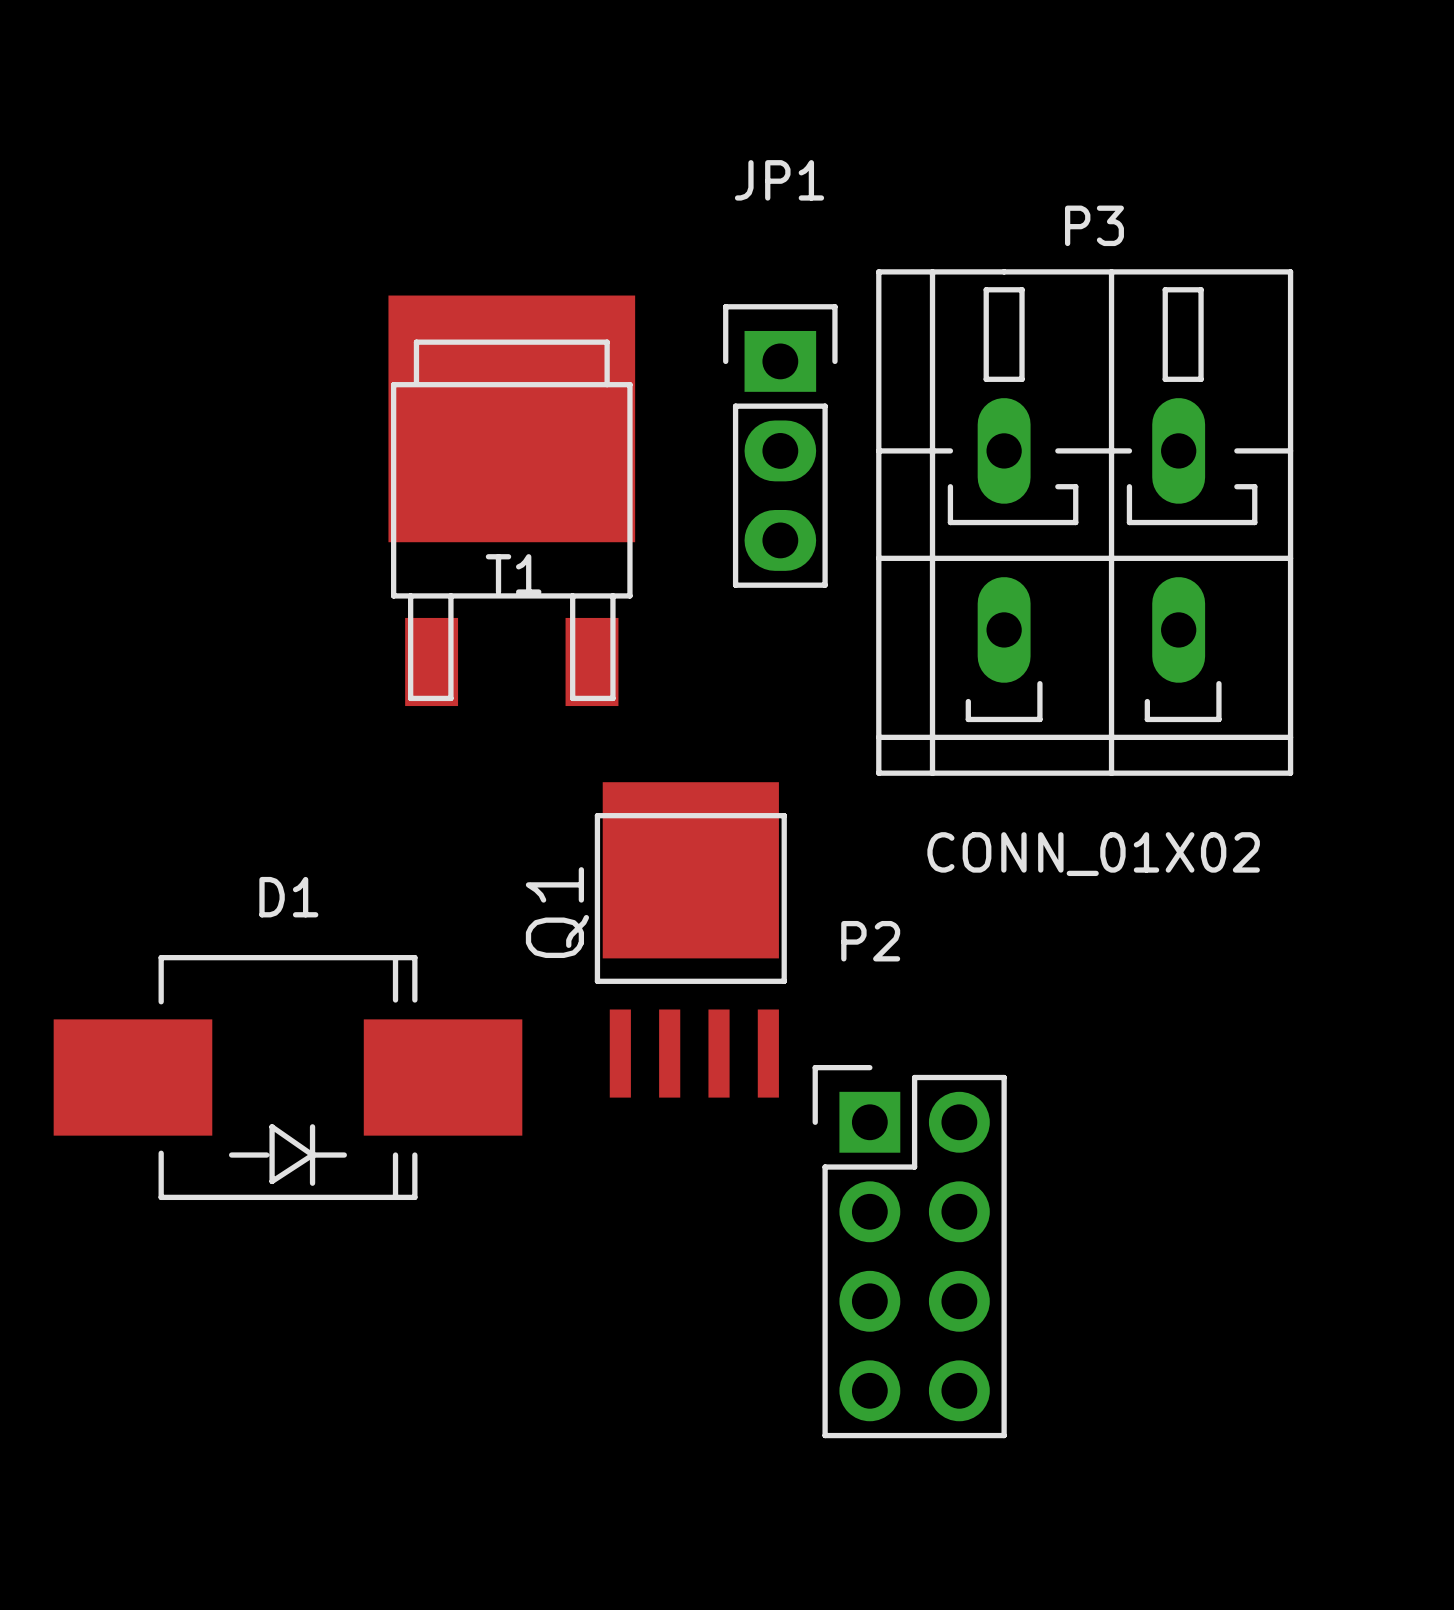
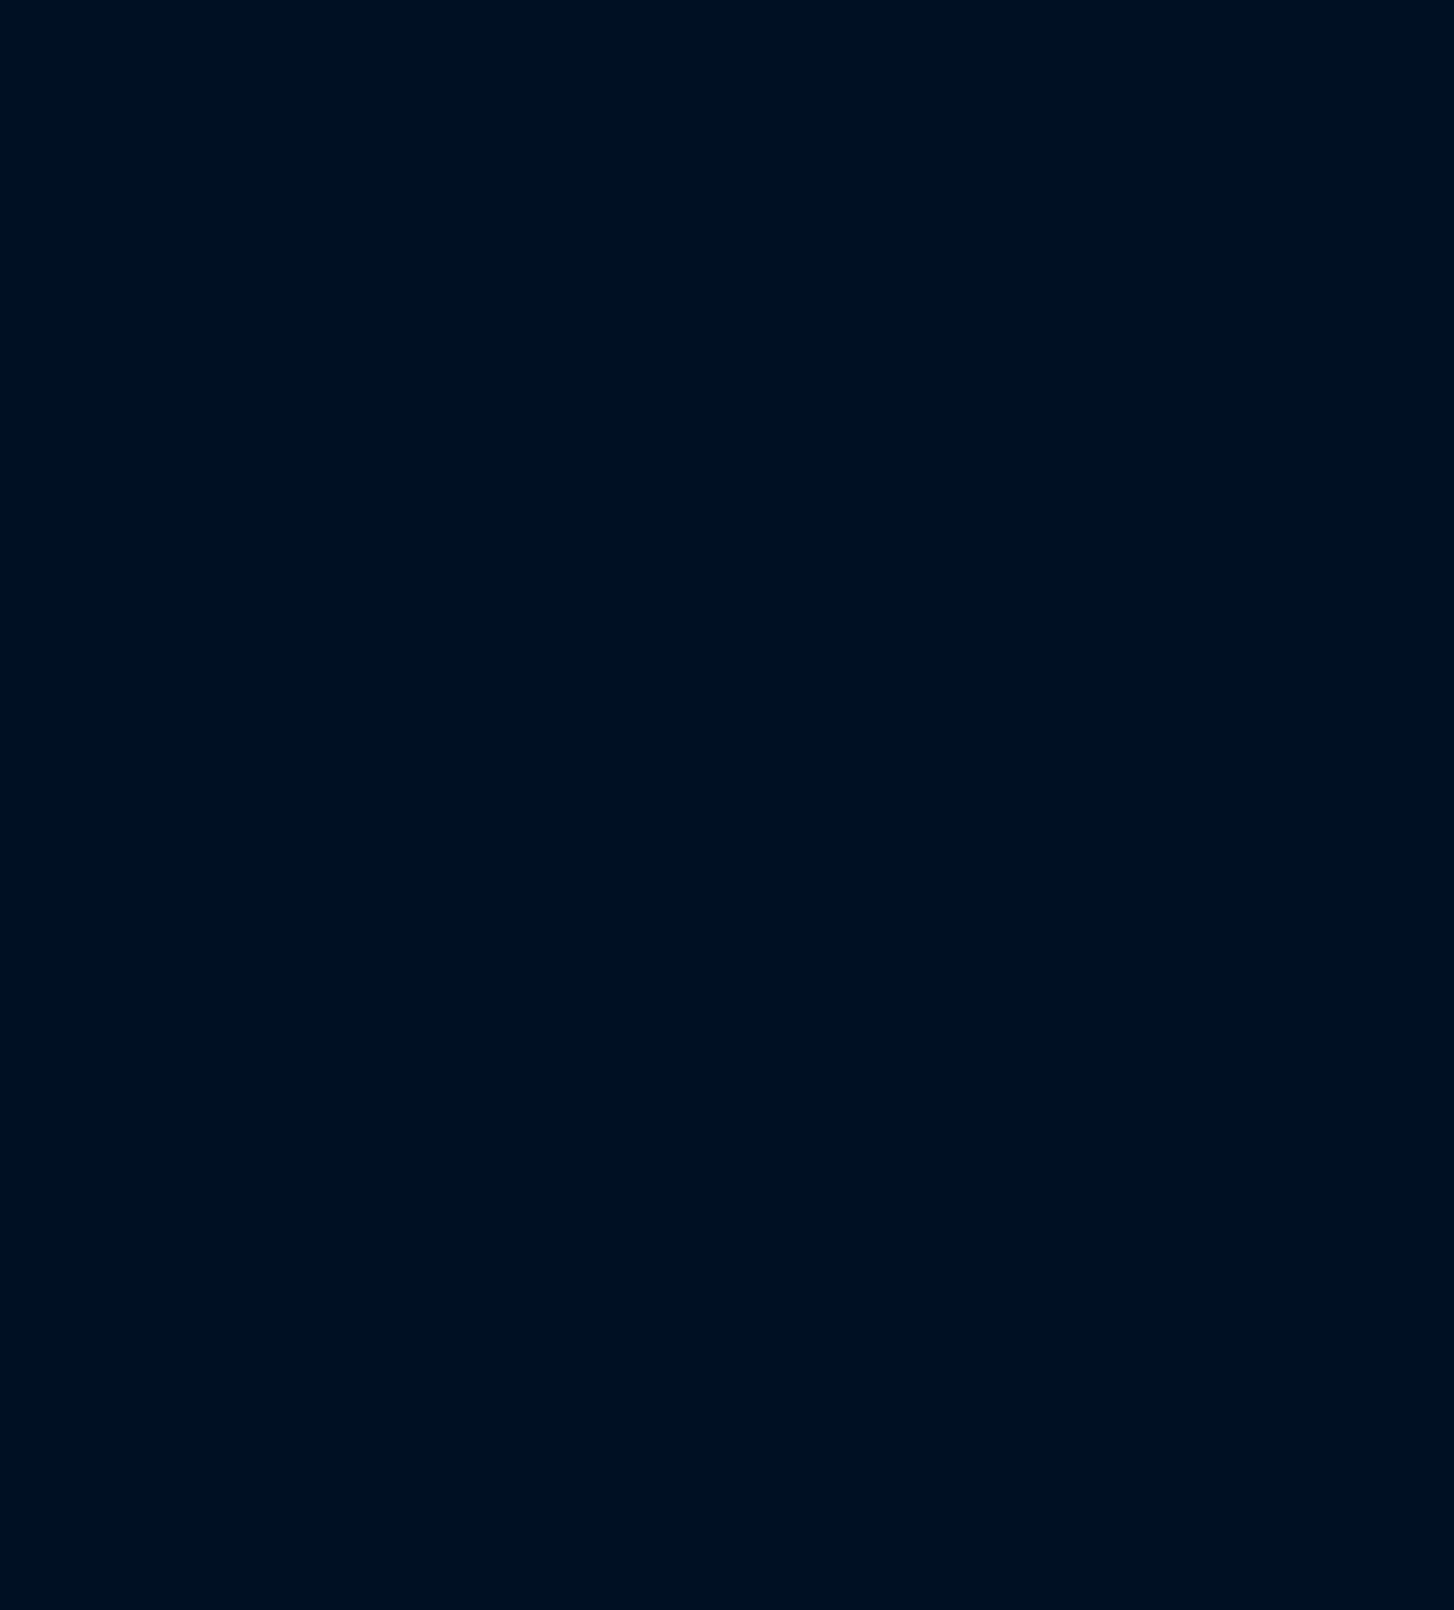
JP1: (780, 445) -> none
T1: (511, 500) -> none
P3: CONN_01X02 (1084, 522) -> none
Q1: (690, 939) -> none
D1: (287, 1077) -> none
P2: (909, 1251) -> none

